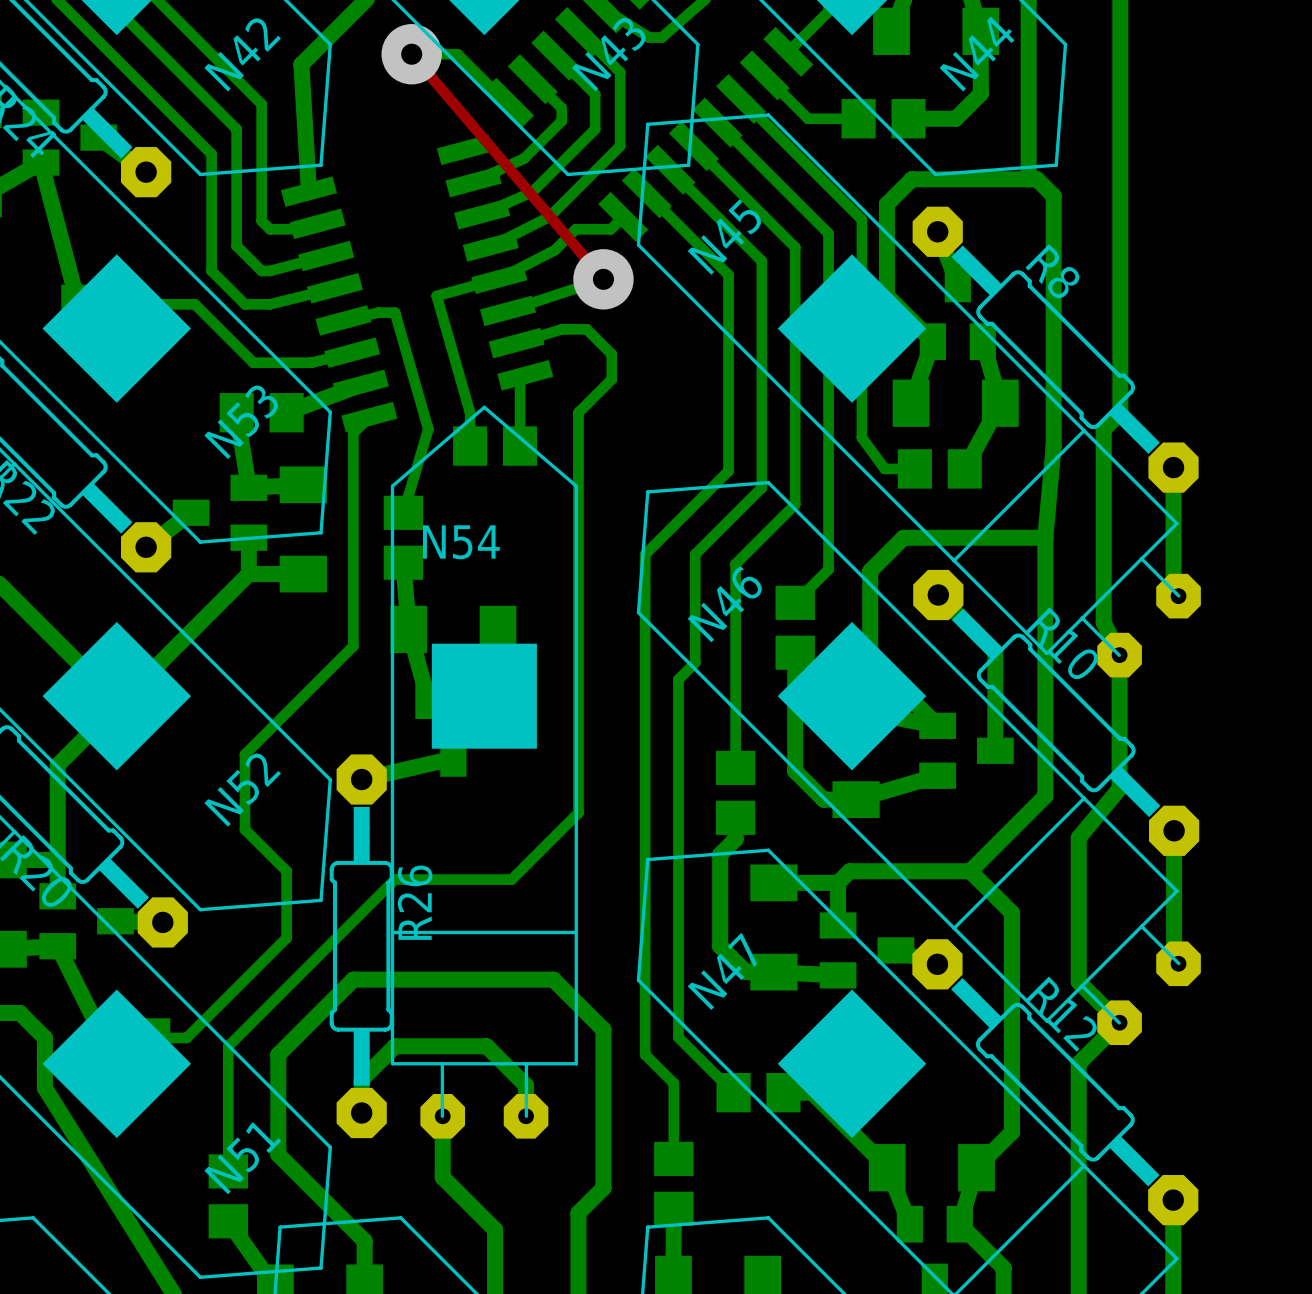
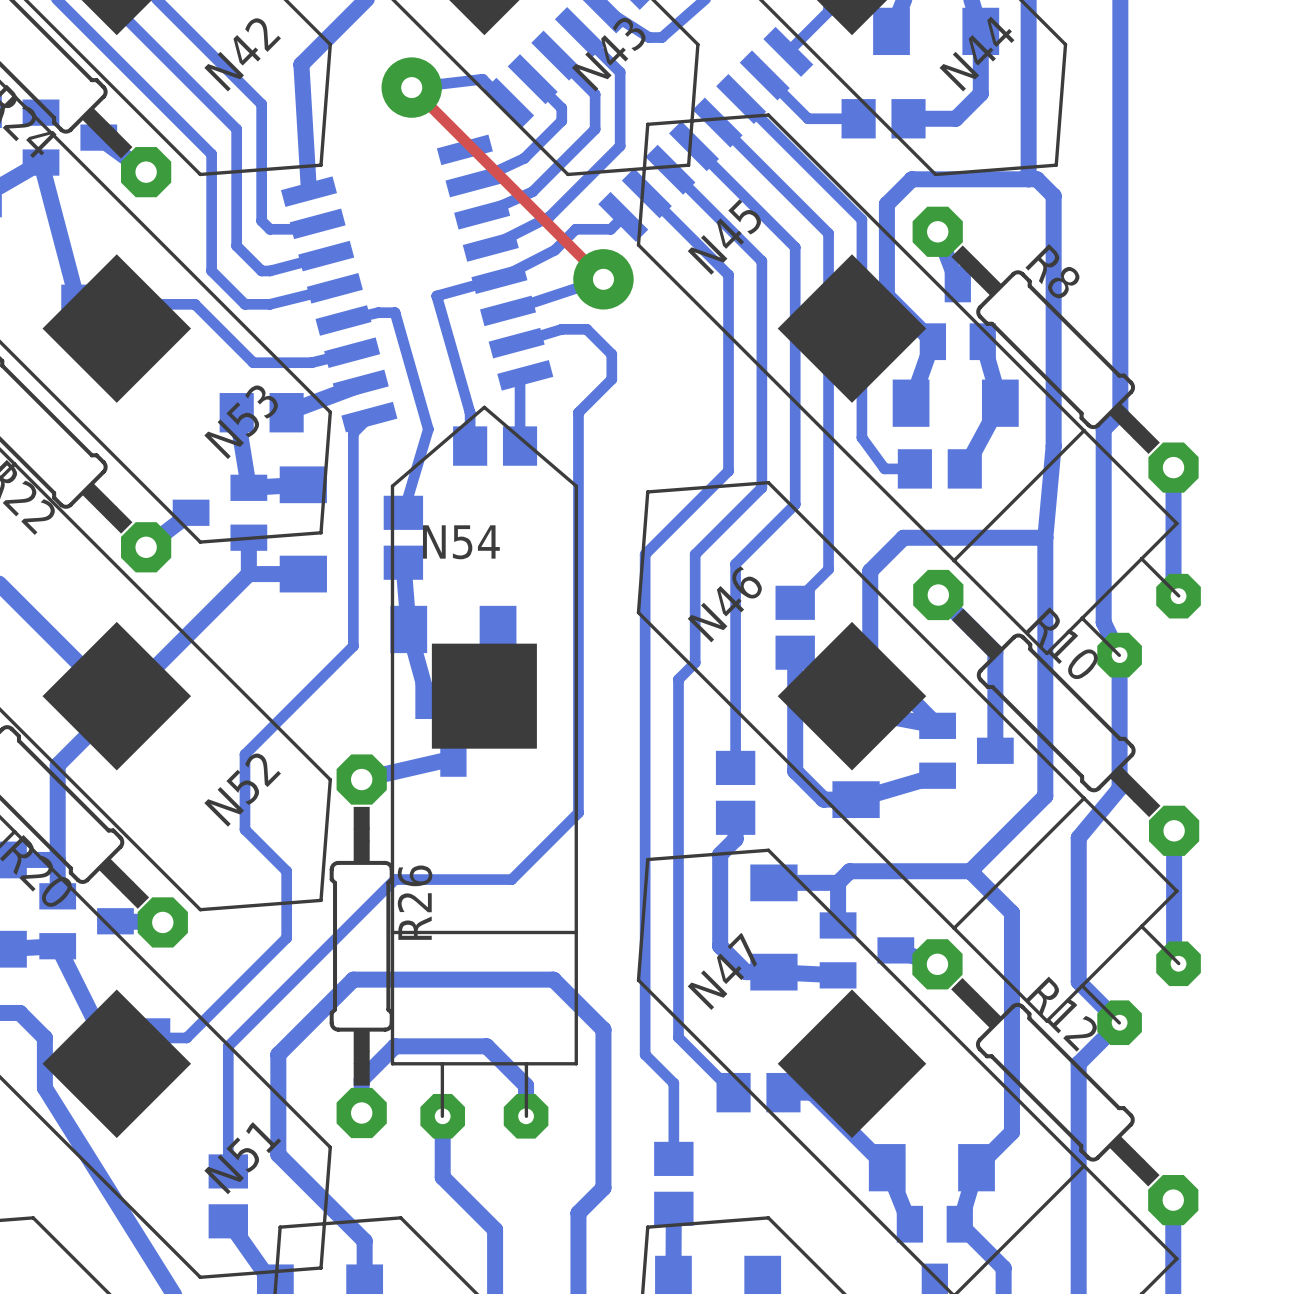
bottom track: (411, 54) (457, 54) (482, 79) -> (411, 87) (482, 79)
top track: (411, 54) (603, 279) -> (411, 87) (603, 279)
via position: (411, 54) -> (411, 87)

